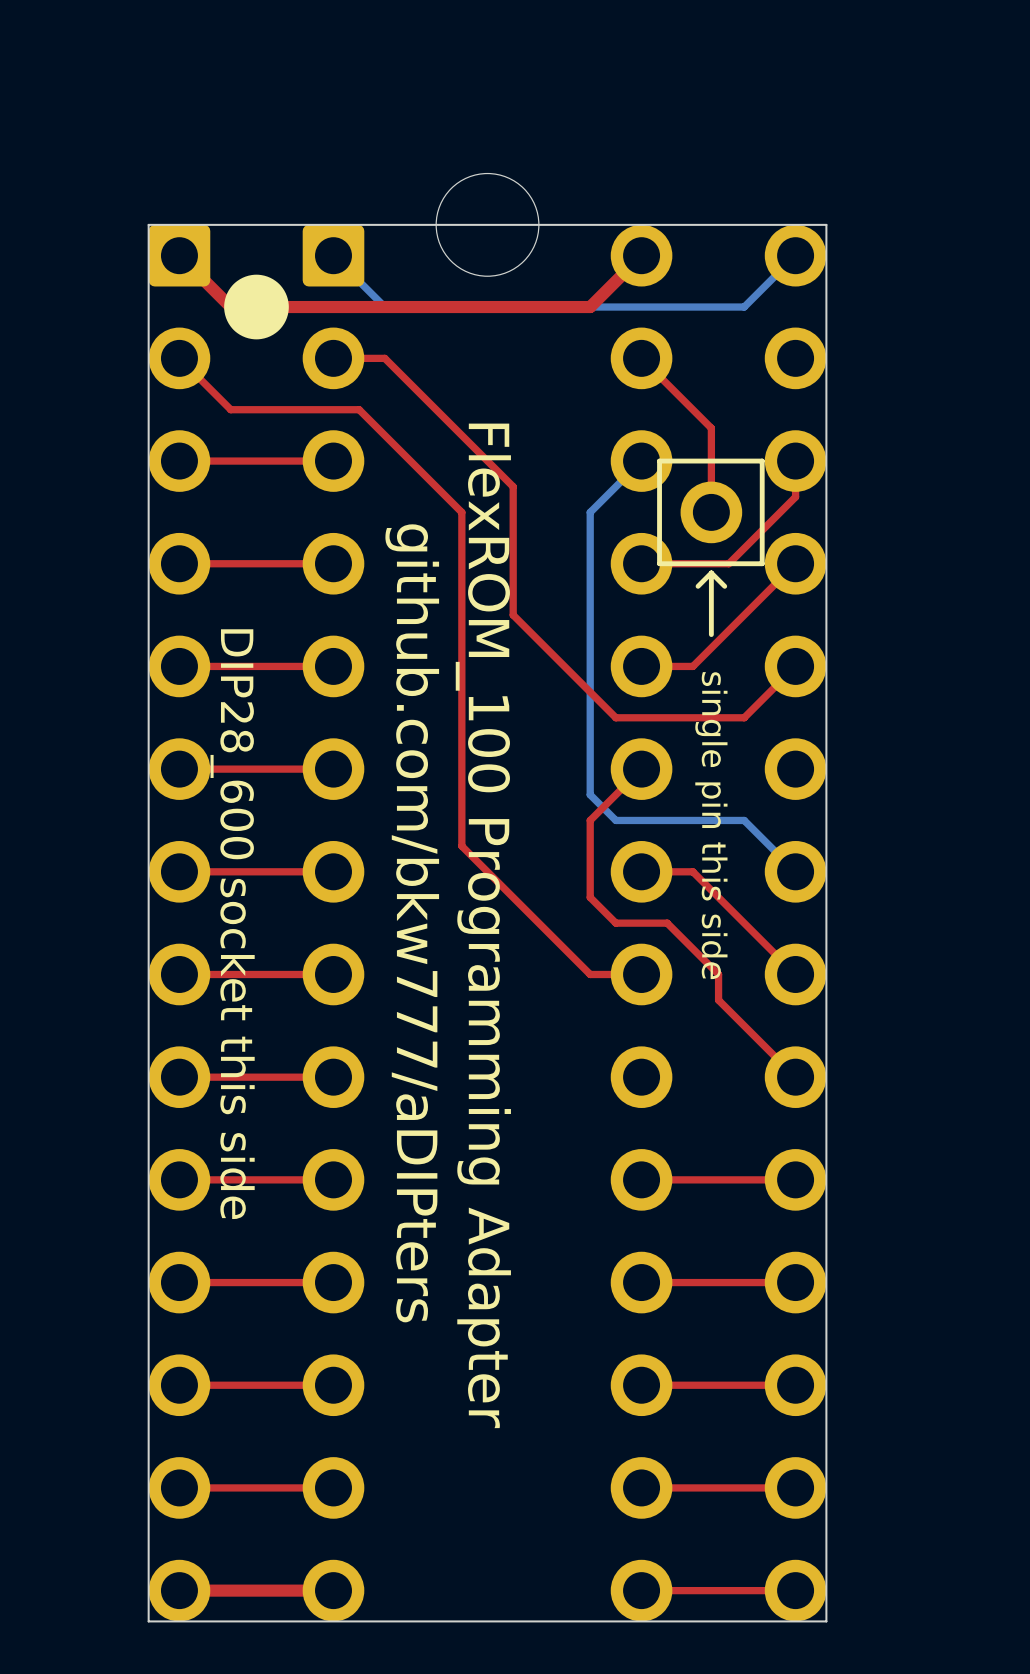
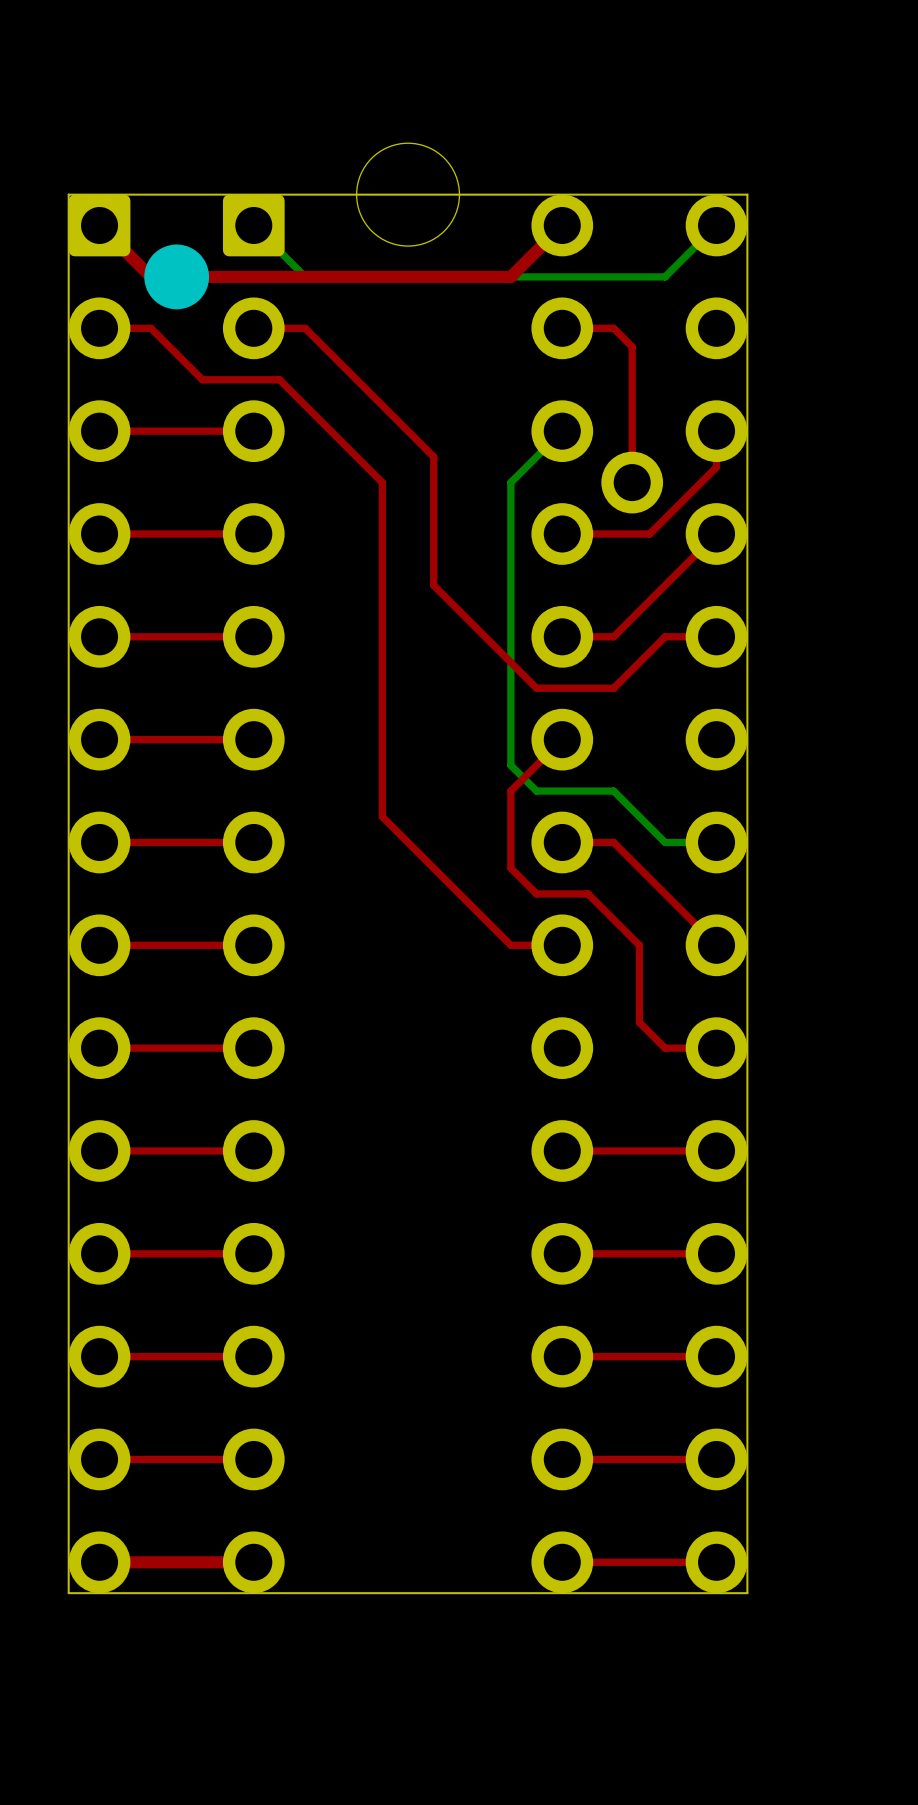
top track: (179, 358) (230, 409) (282, 409) -> (99, 328) (150, 328) (202, 379)
top track: (641, 358) (711, 428) -> (562, 328) (613, 328) (632, 346) (632, 398)
line: (659, 461) (762, 461) (762, 563) (659, 563) (659, 461) -> none
line: (711, 572) (724, 586) -> none
line: (711, 572) (698, 586) -> none
line: (711, 572) (711, 634) -> none
top track: (795, 666) (744, 717) (692, 717) -> (716, 636) (665, 636) (613, 688)
bottom track: (692, 820) (744, 820) (795, 871) -> (613, 791) (665, 842) (716, 842)
text: single pin this side (711, 825) -> none
text: github.com/bkw777/aDIPters (412, 923) -> none
text: DIP28_600 socket this side (232, 924) -> none
text: FlexROM_100 Programming Adapter (483, 925) -> none
top track: (718, 1000) (795, 1077) -> (639, 971) (639, 1022) (665, 1048) (716, 1048)

